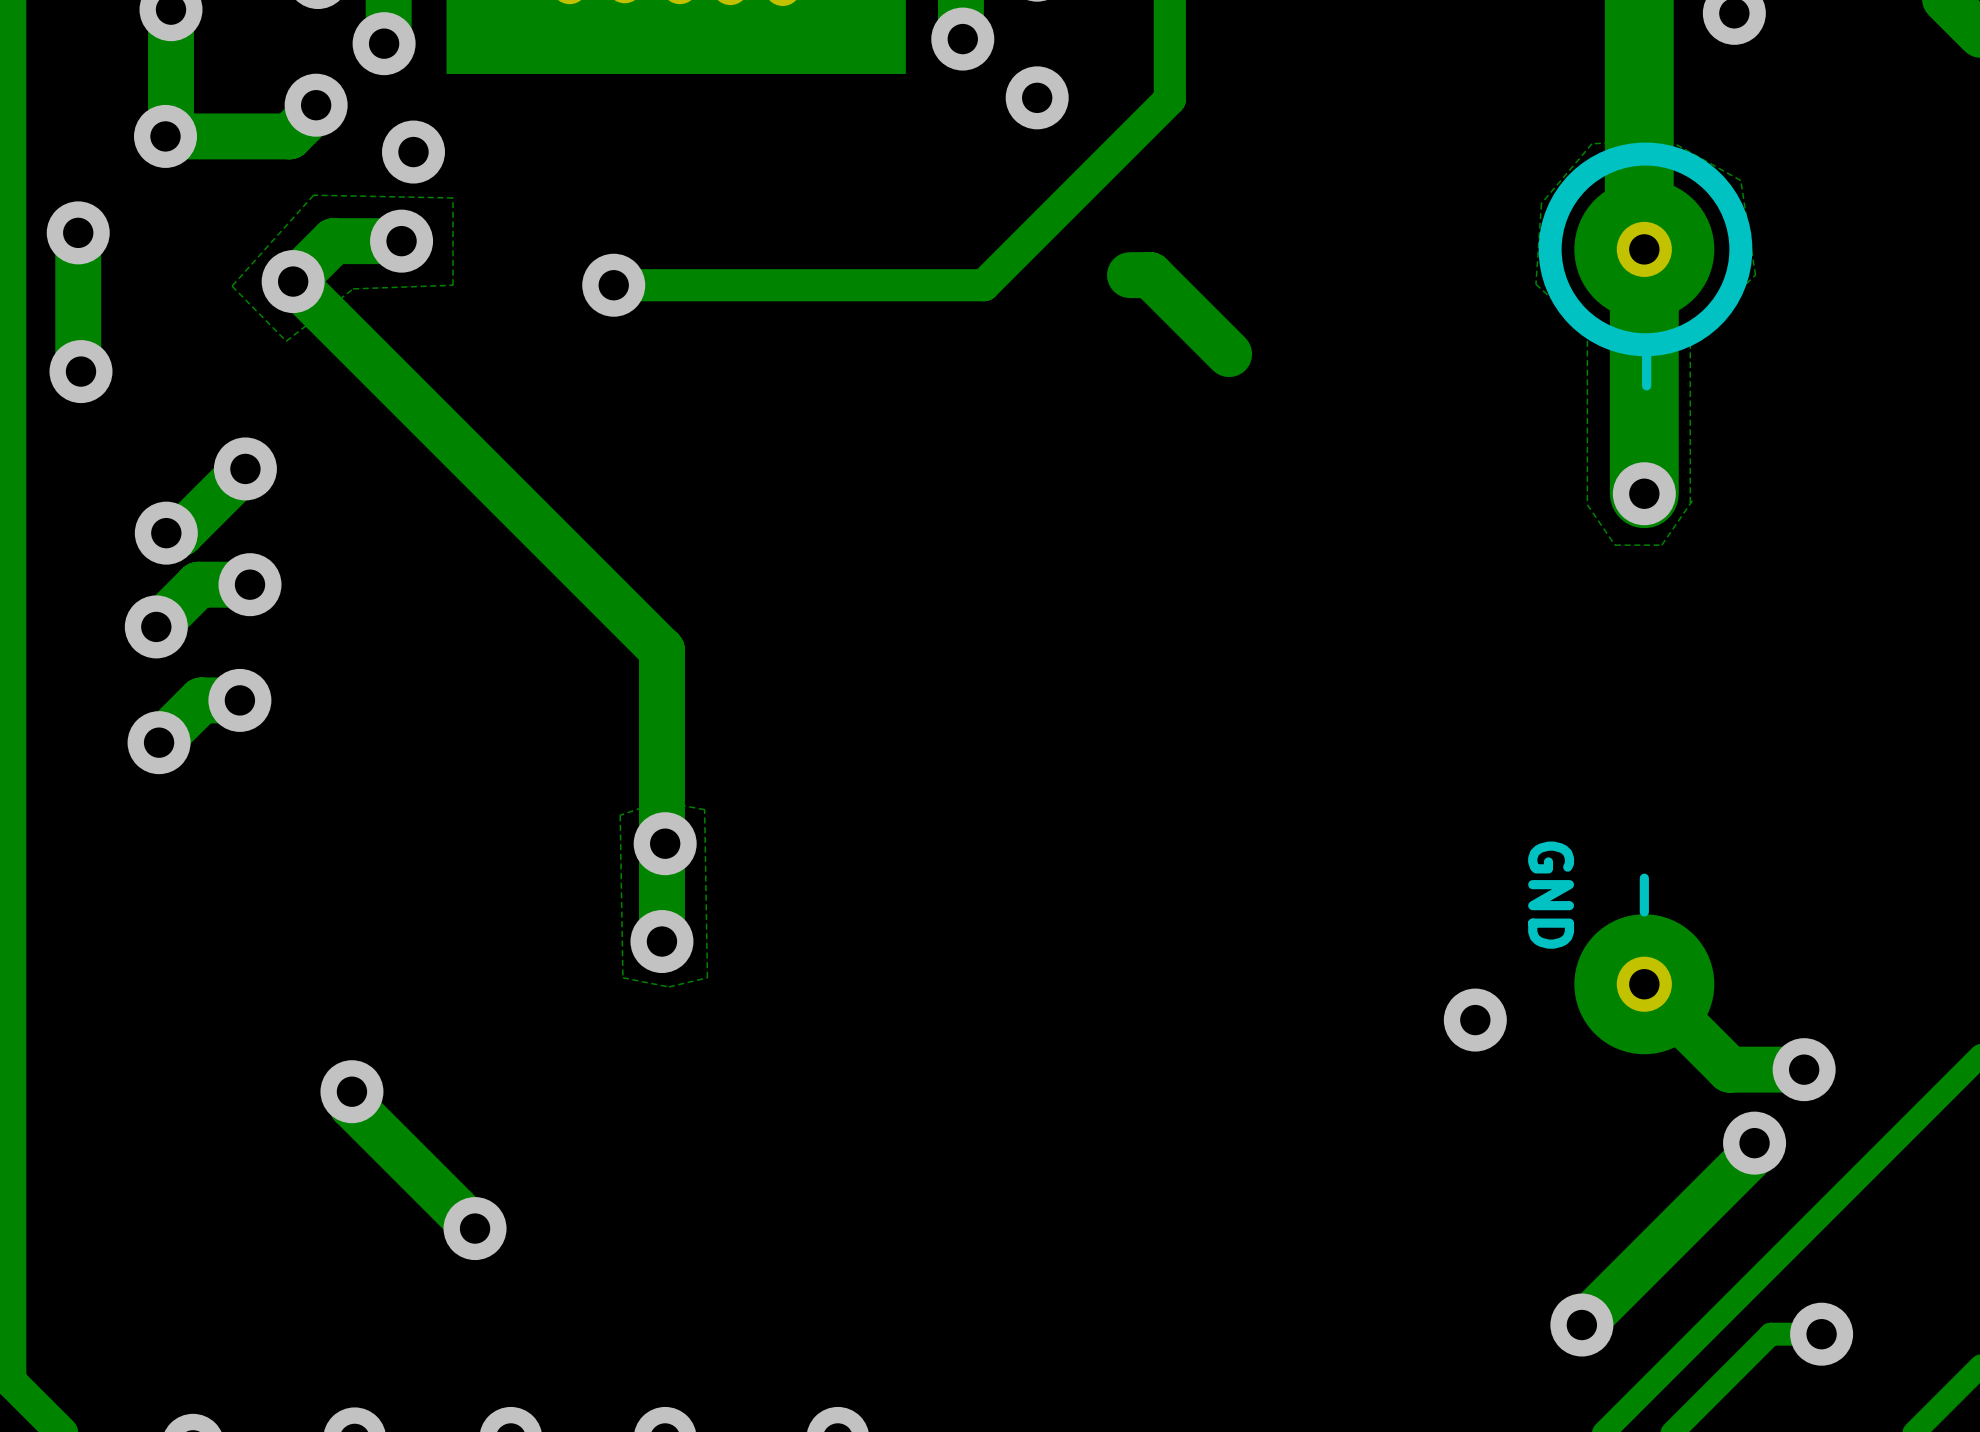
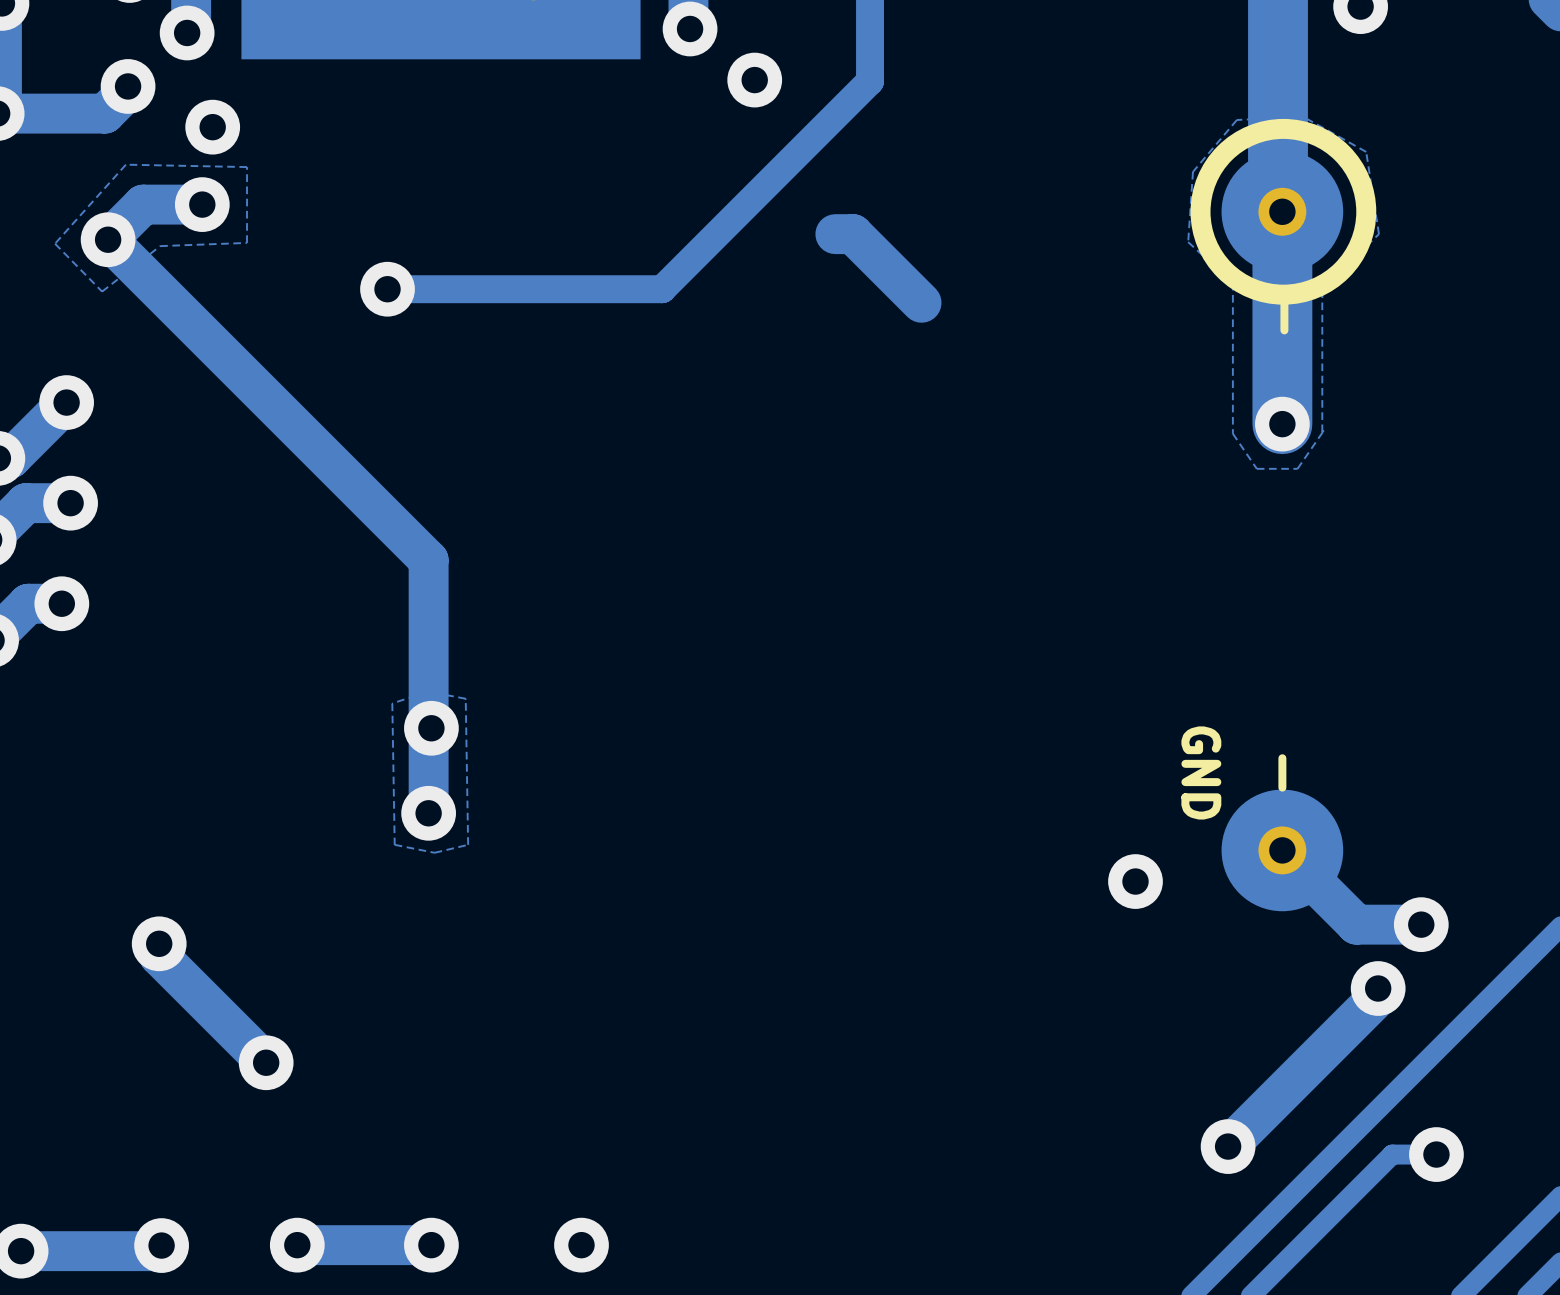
via position: (613, 285) -> (387, 289)
track: (983, 285) (613, 285) -> (708, 242) (662, 289) (387, 289)

